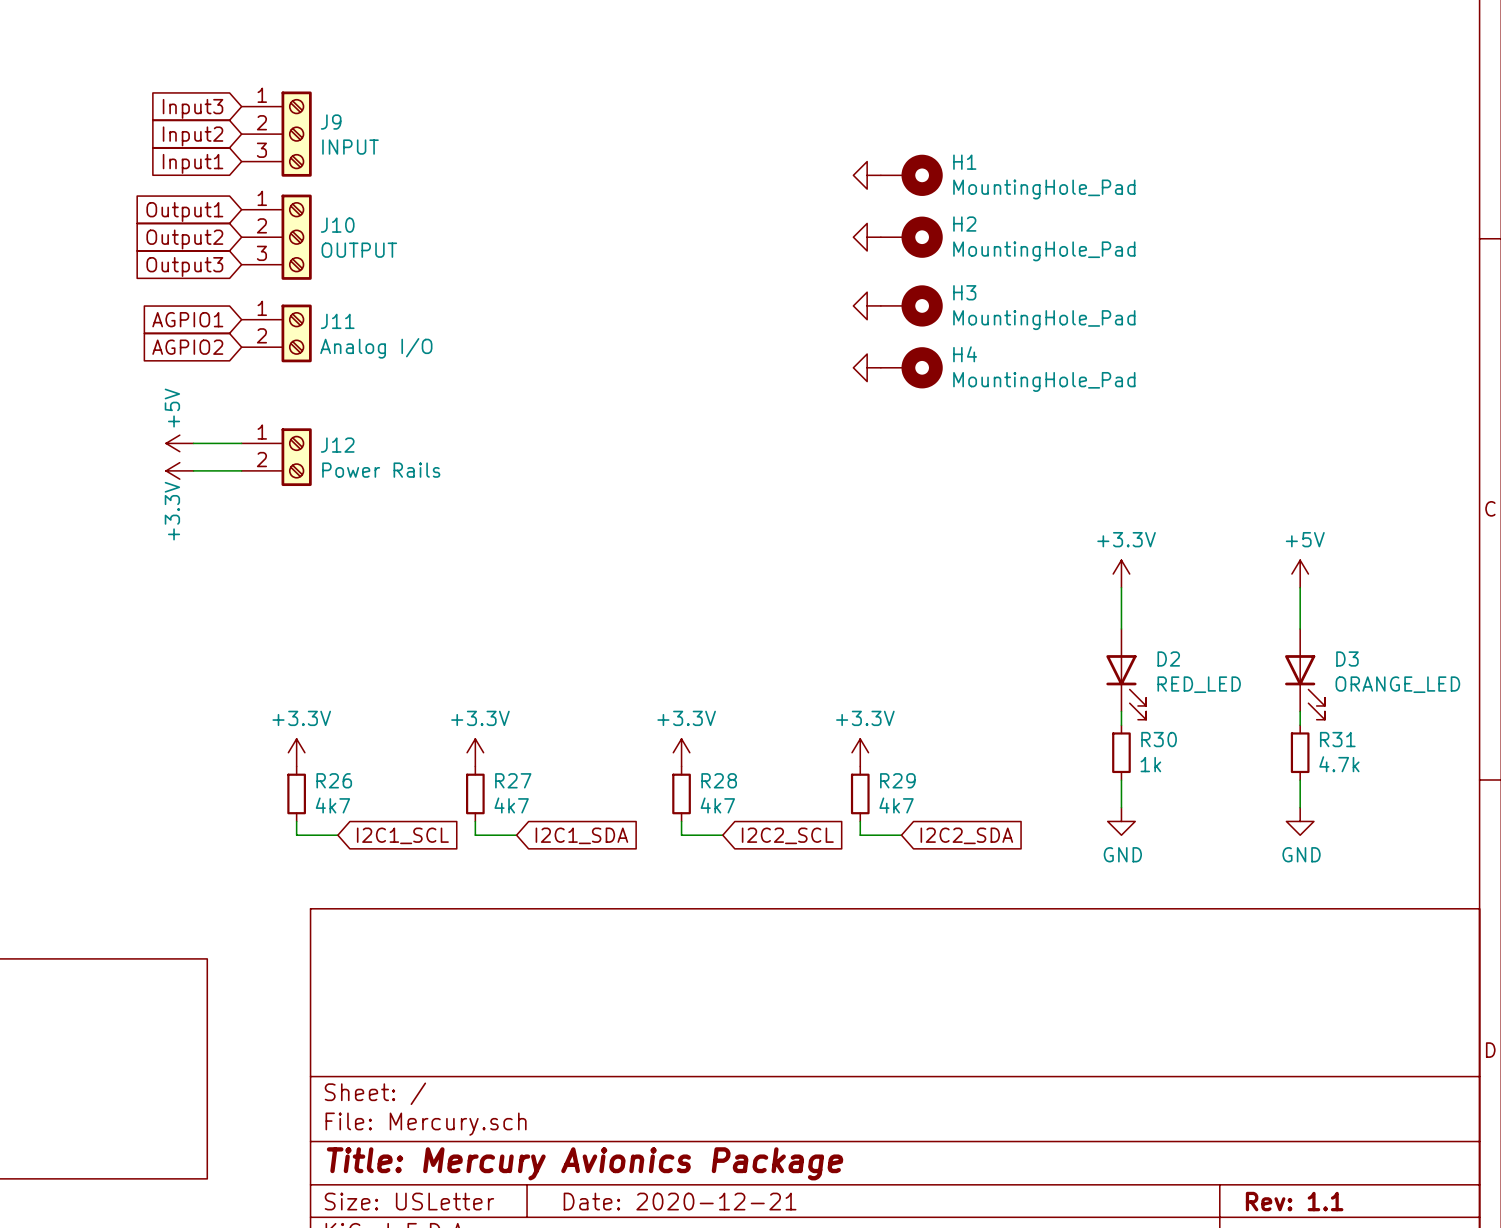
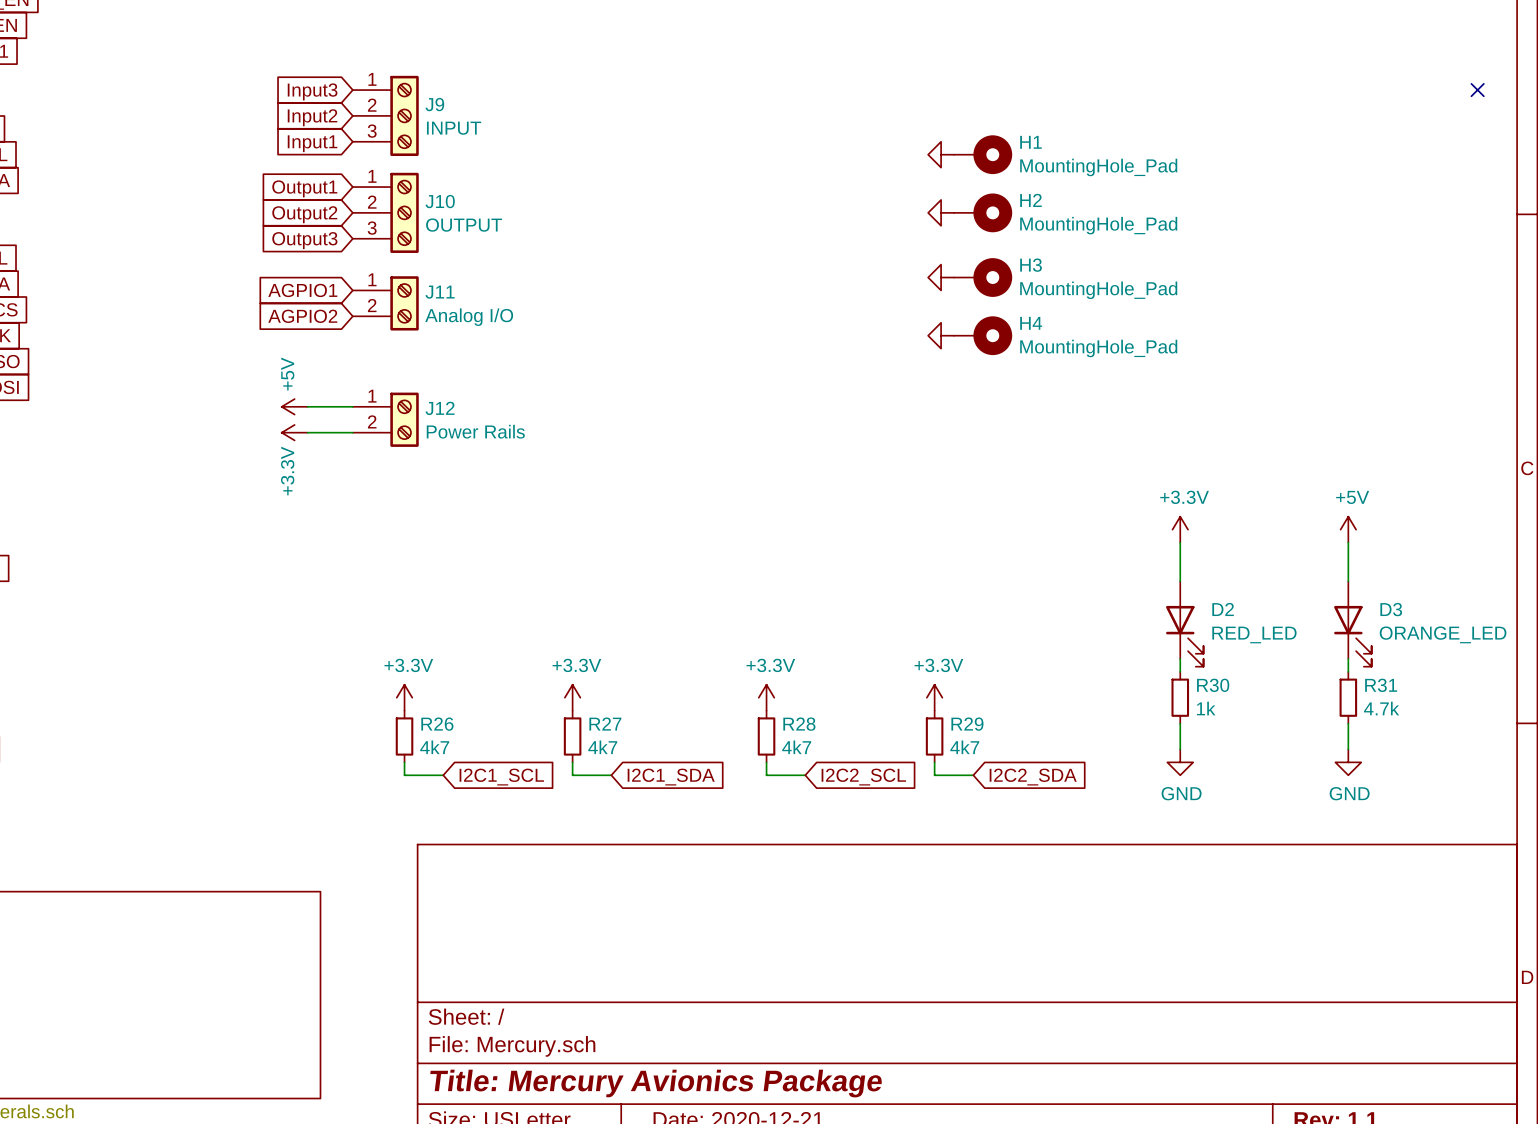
no-connect mark: none -> (1477, 90)

